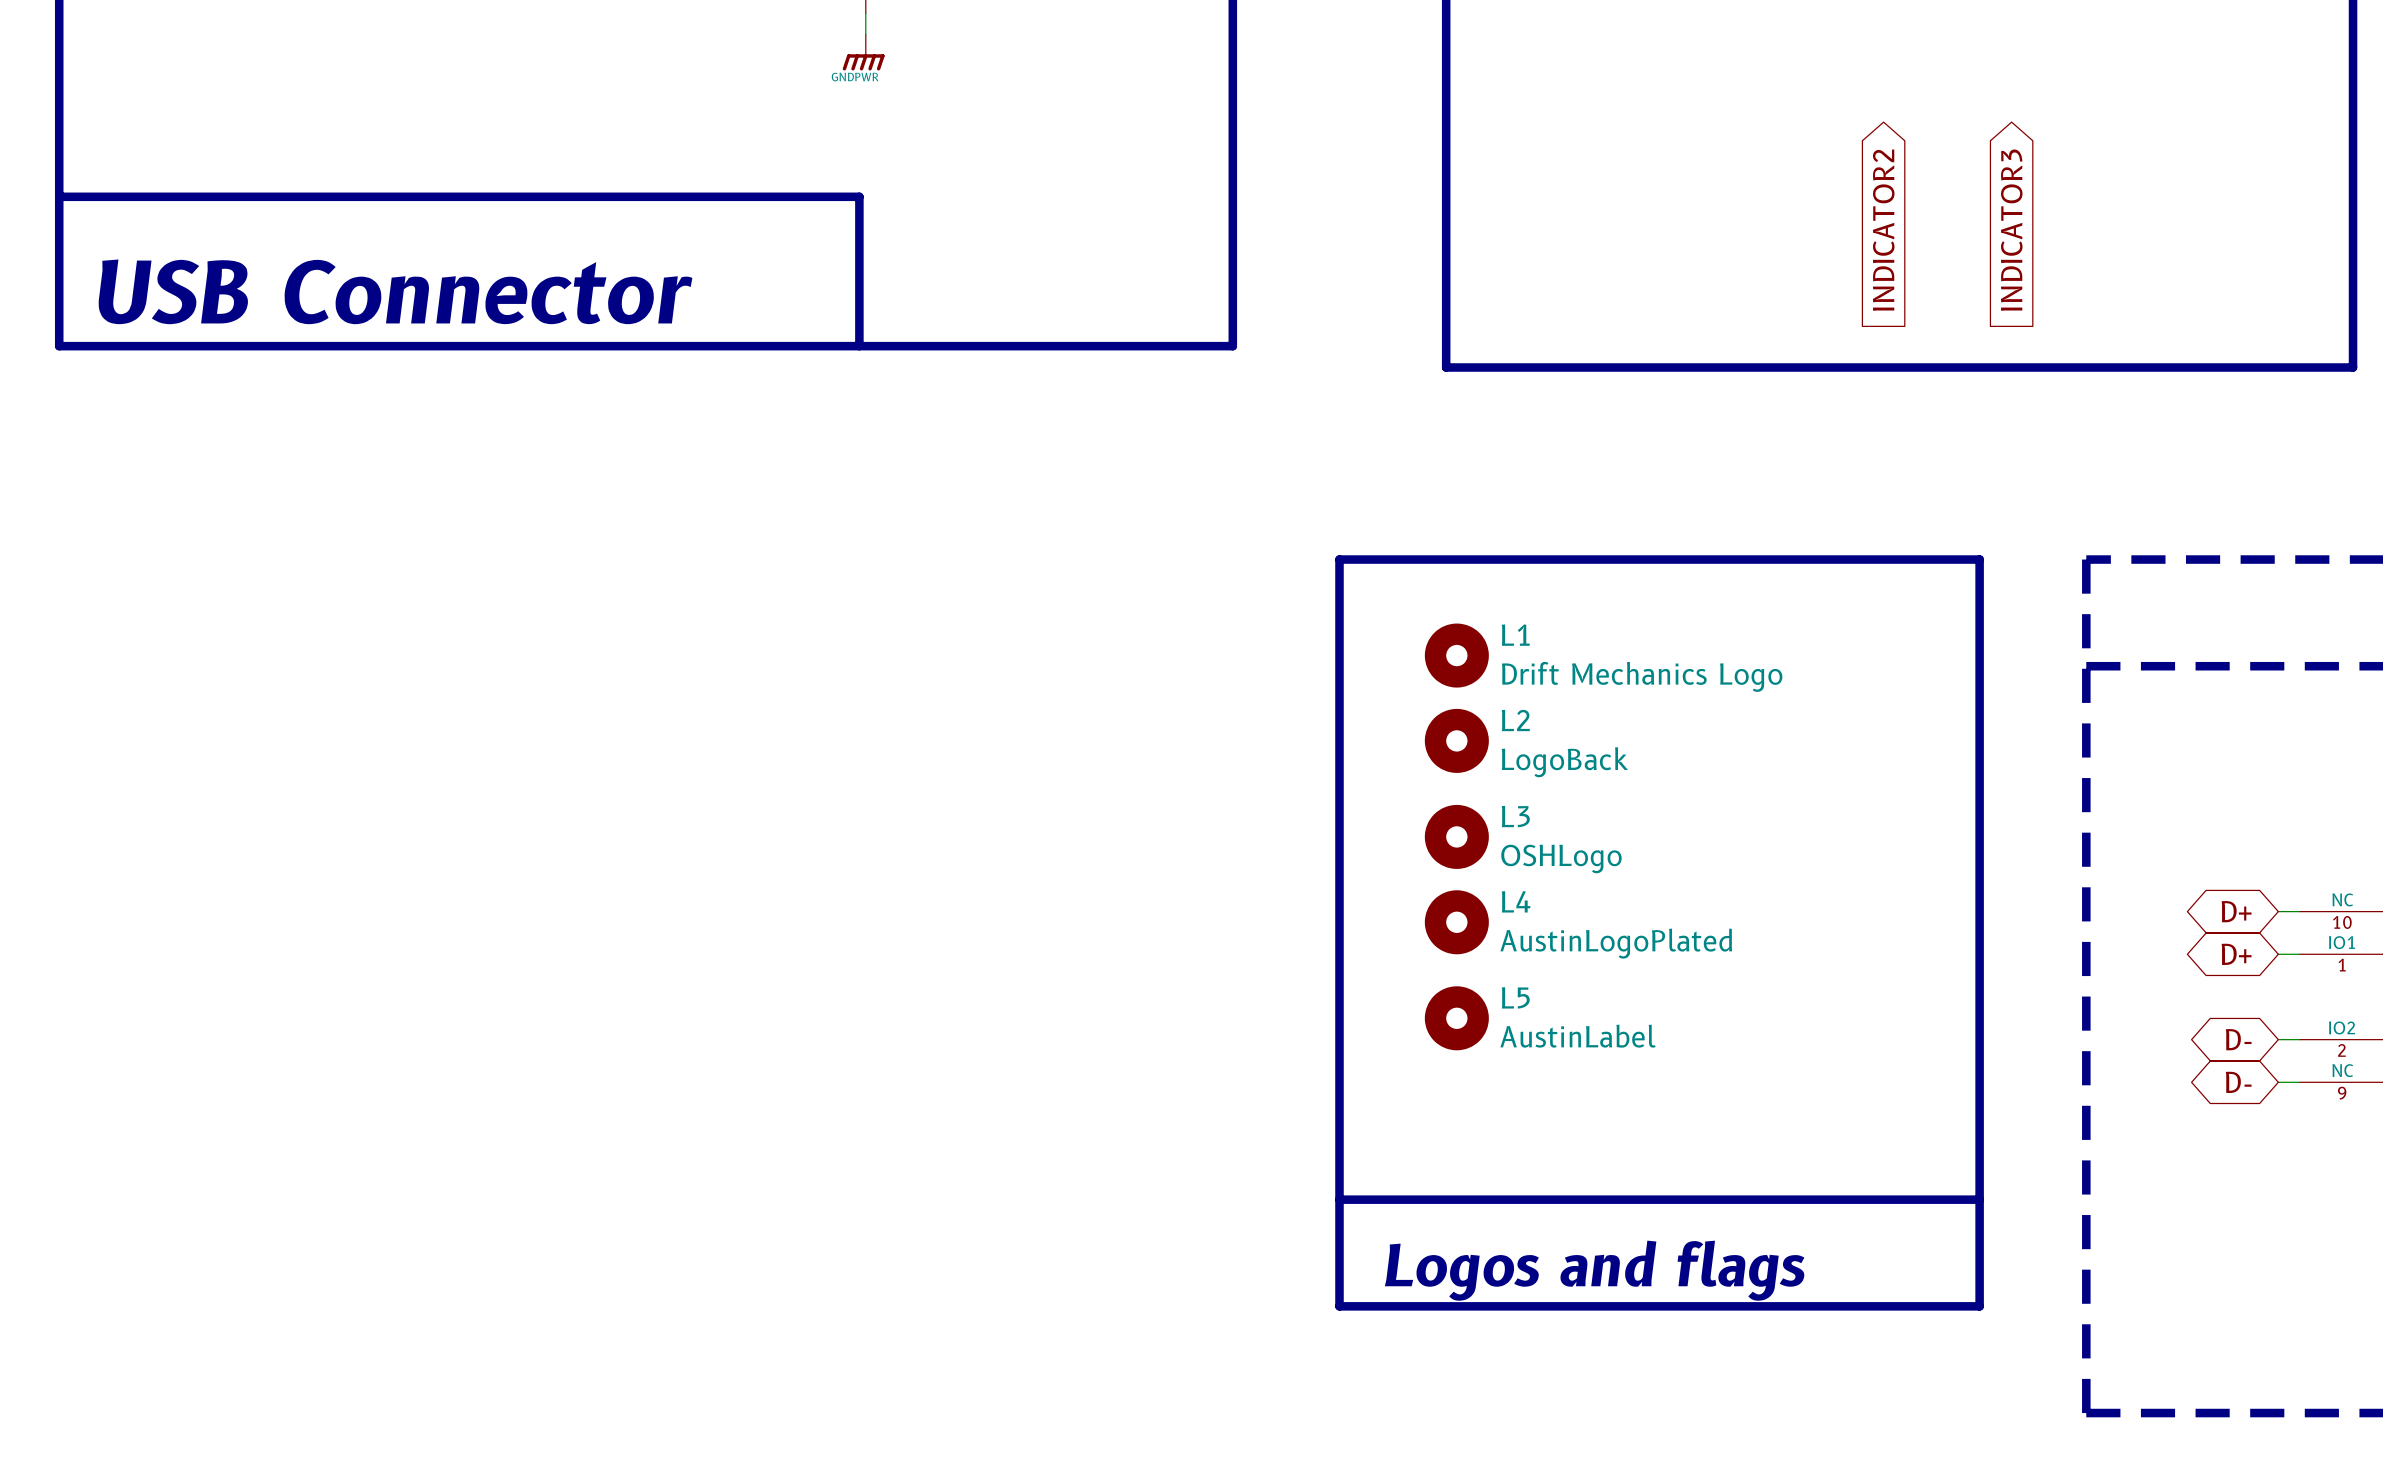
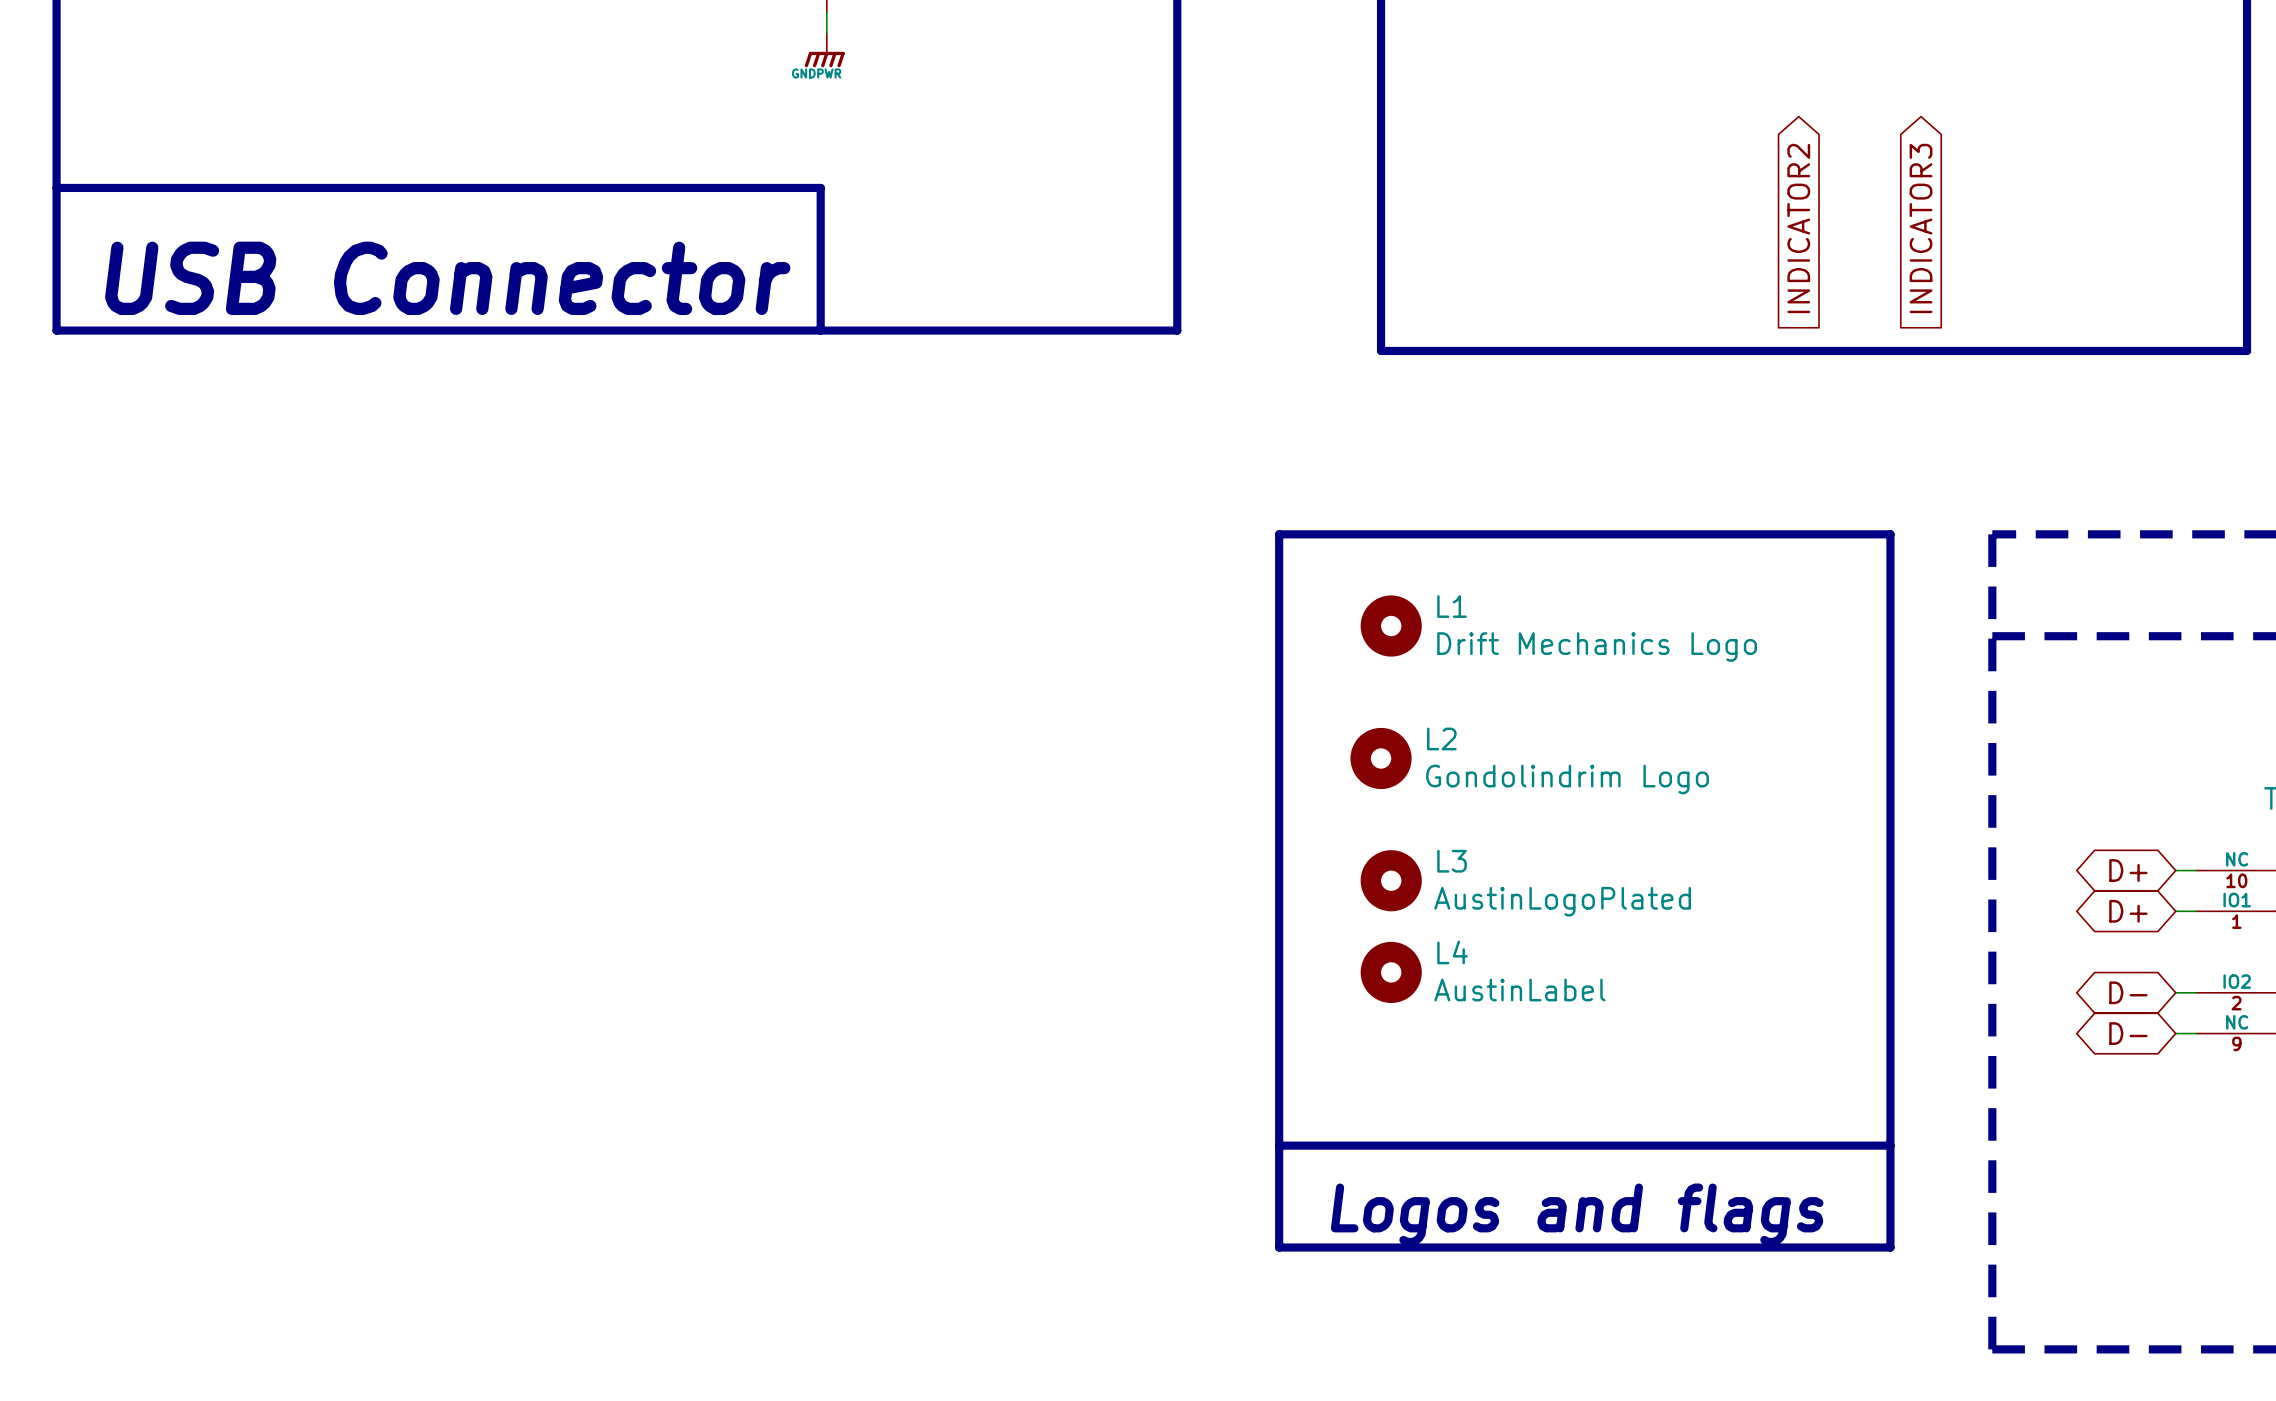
L2 position: (1456, 740) -> (1381, 758)
L2 value: LogoBack (1564, 762) -> Gondolindrim Logo (1567, 779)
L3: OSHLogo (1456, 836) -> none
L4 name: L4 (1516, 901) -> L3 (1452, 861)
L5 name: L5 (1515, 997) -> L4 (1452, 952)

